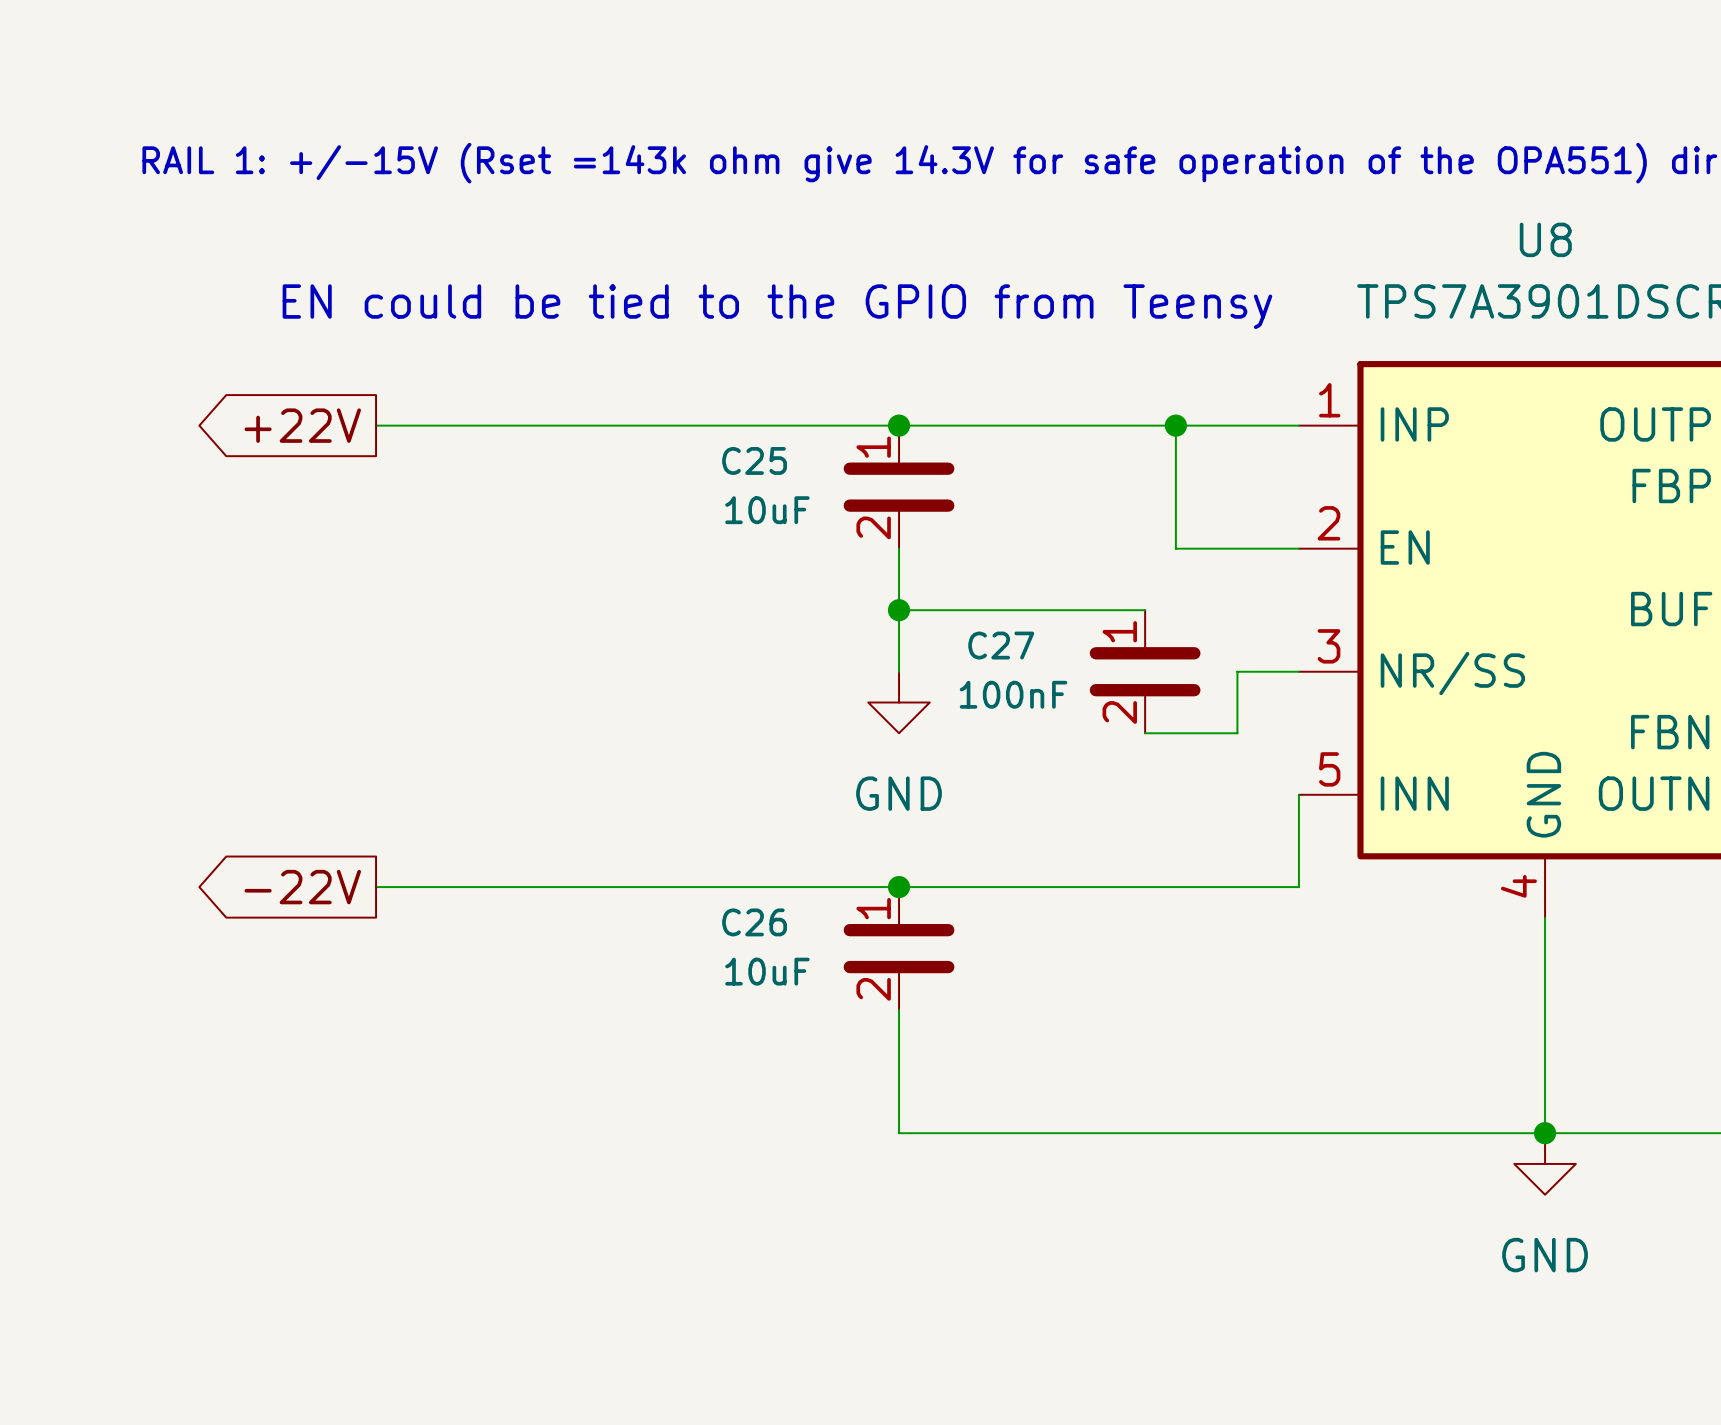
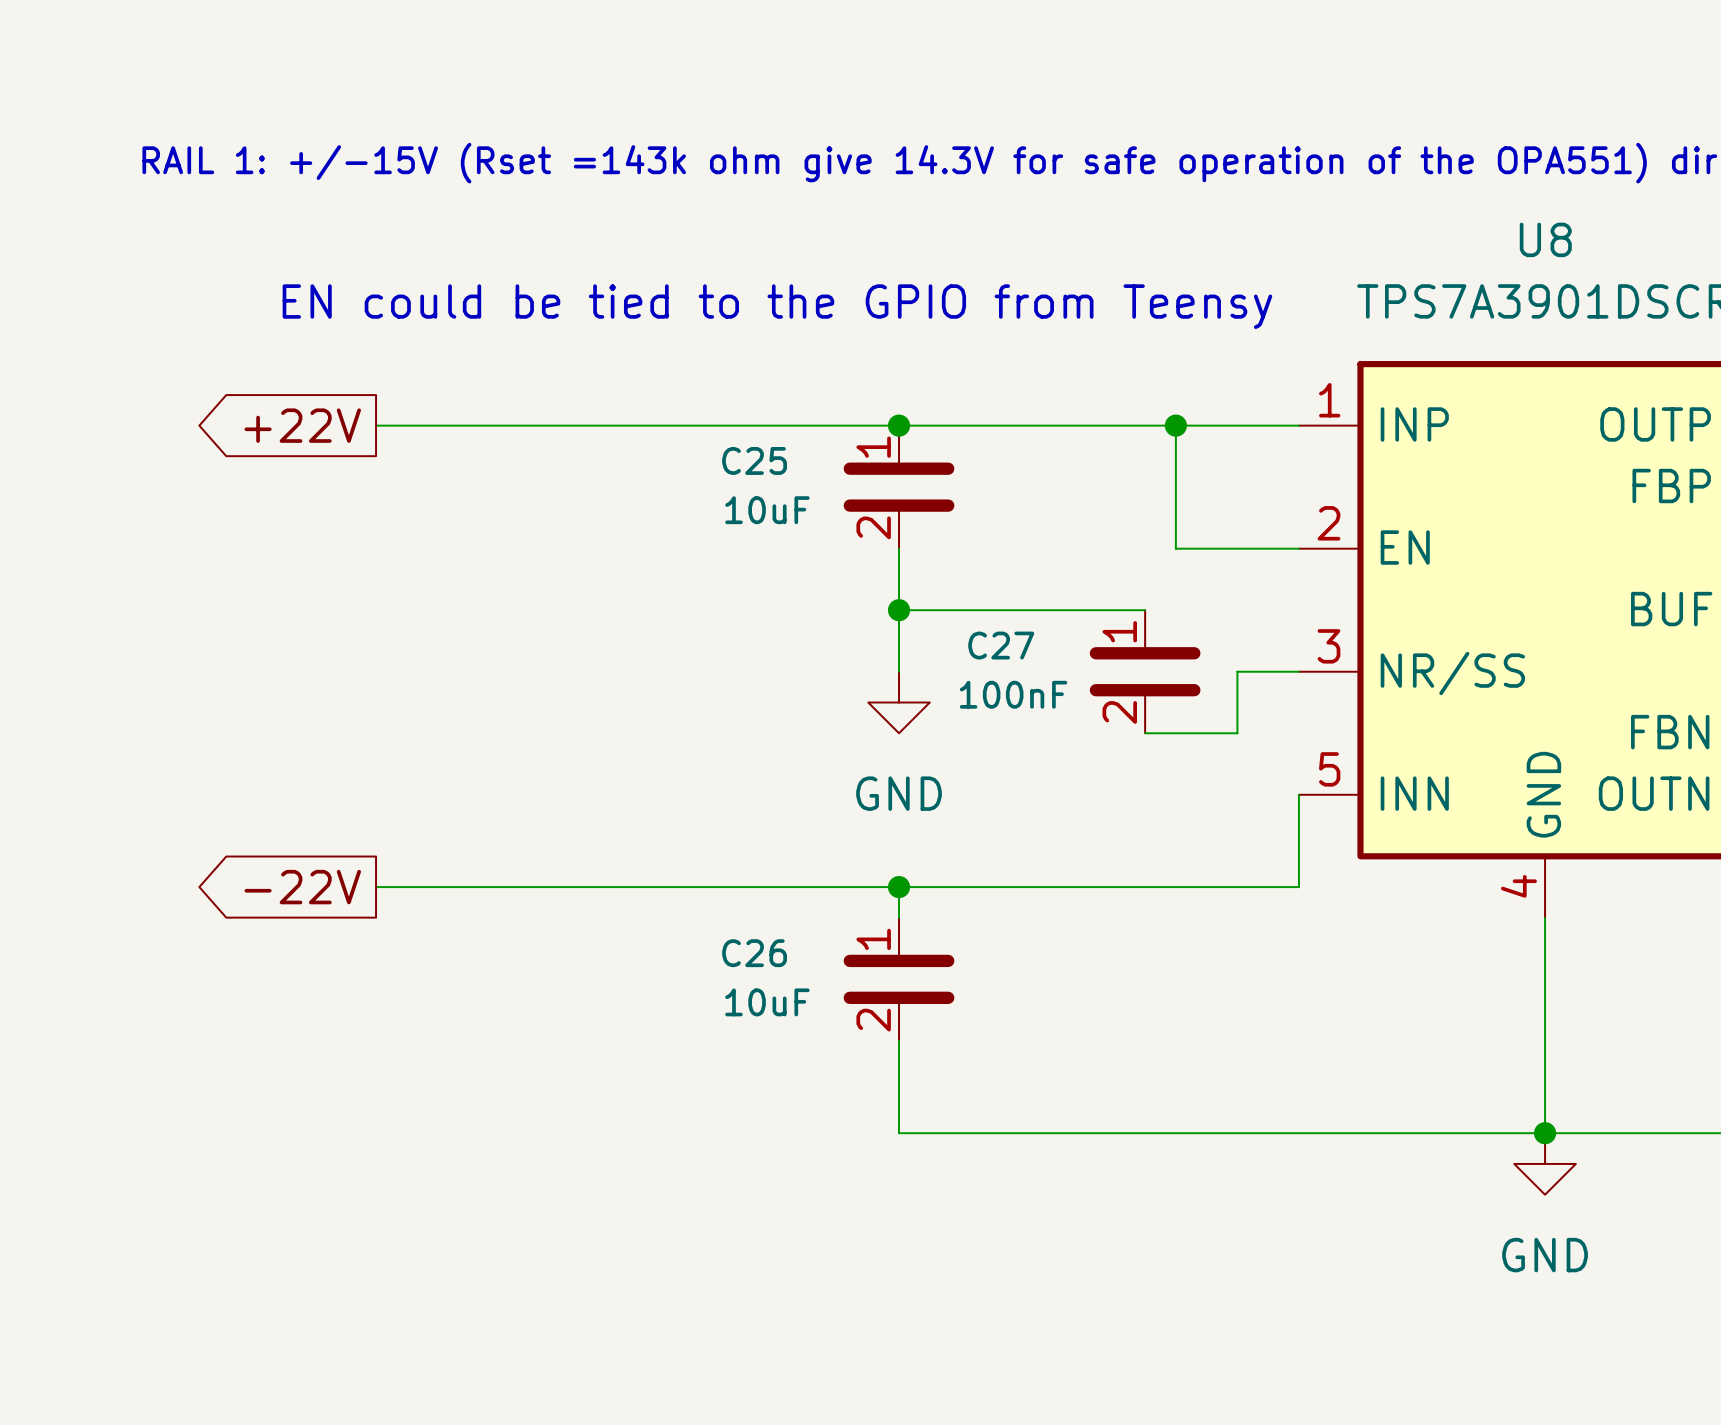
C26 position: (899, 948) -> (899, 979)

